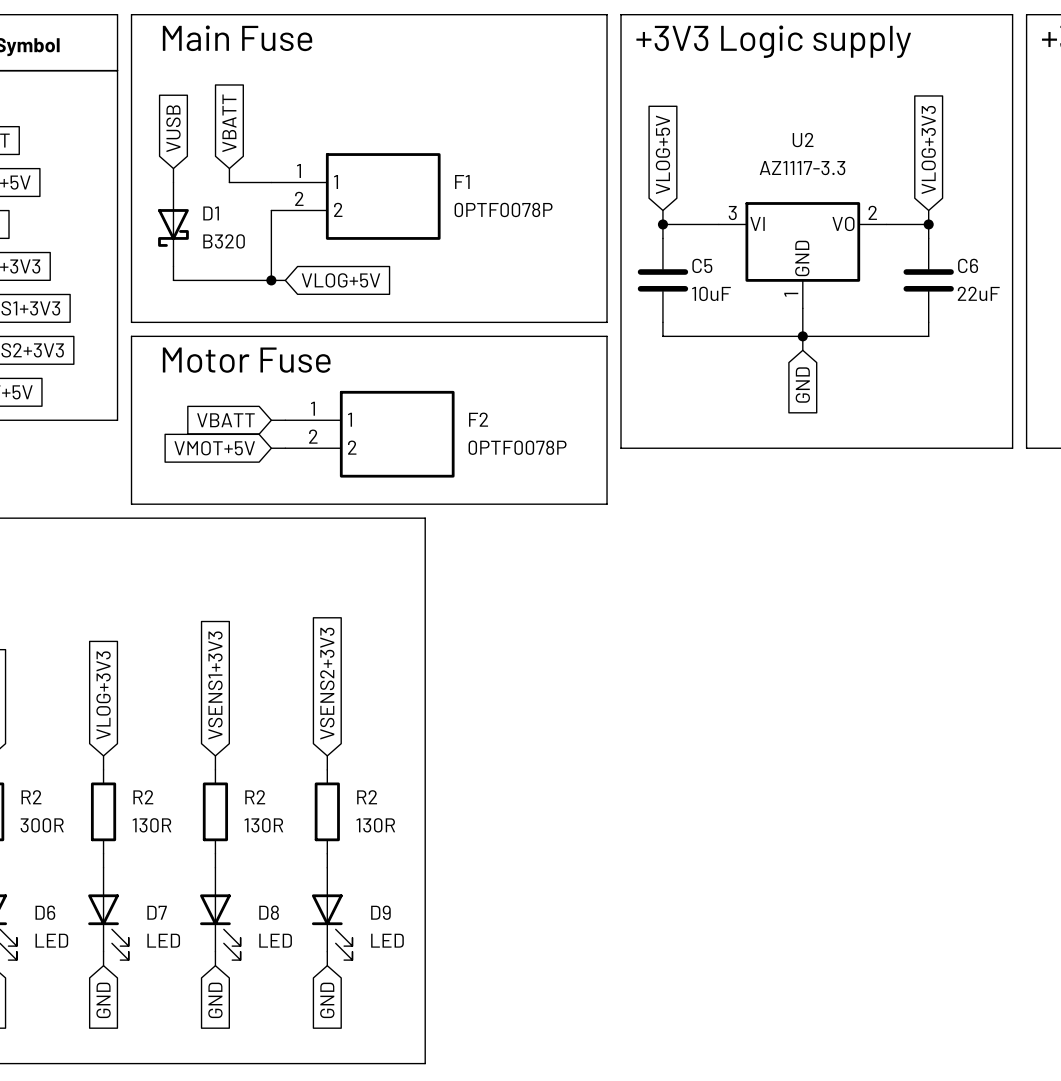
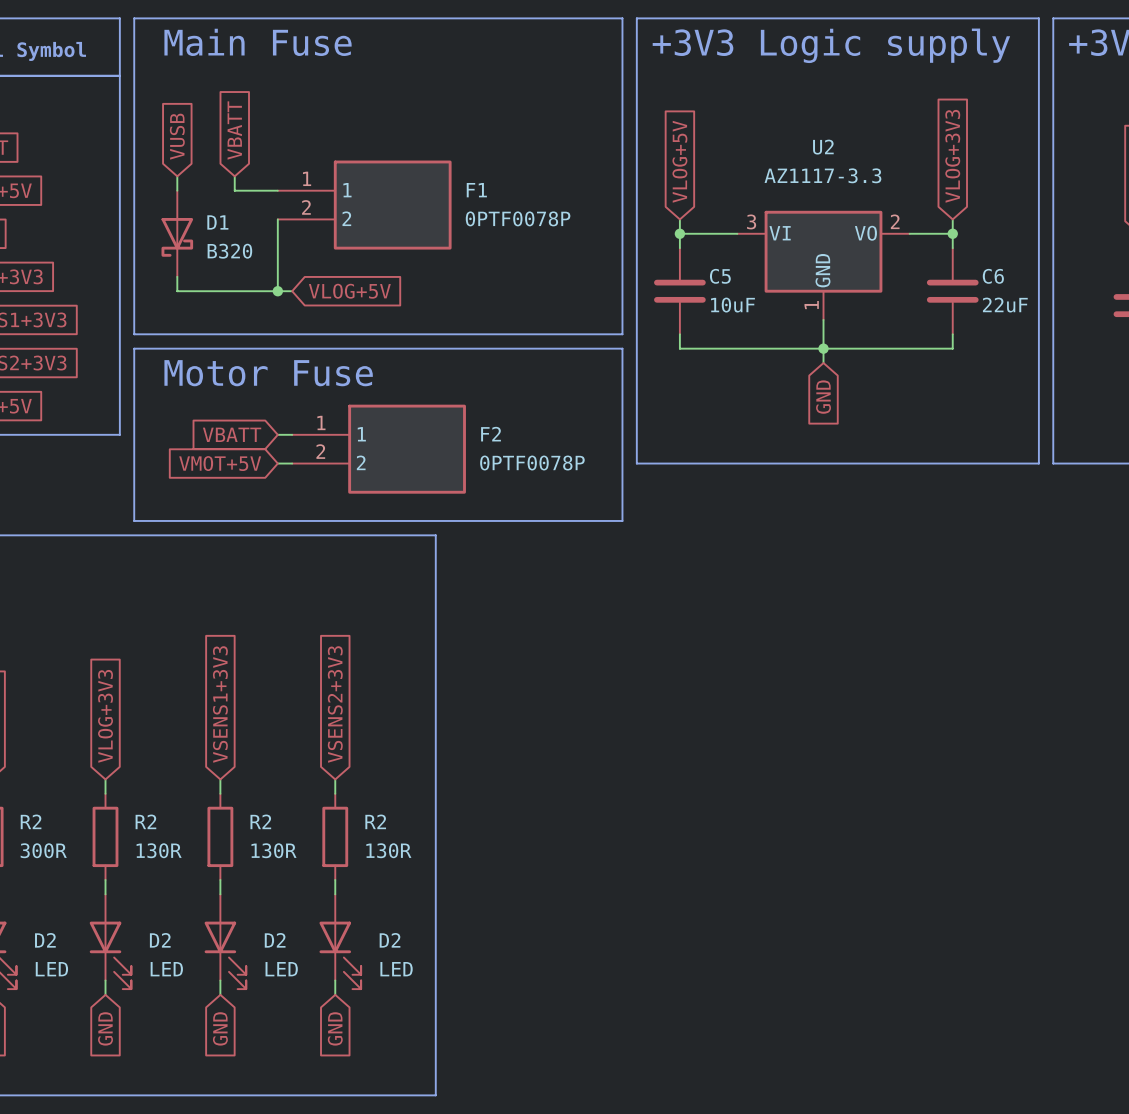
D6 name: D6 (45, 912) -> D2 (45, 940)
D7 name: D7 (157, 912) -> D2 (160, 940)
D8 name: D8 (269, 912) -> D2 (275, 940)
D9 name: D9 (380, 912) -> D2 (390, 940)

